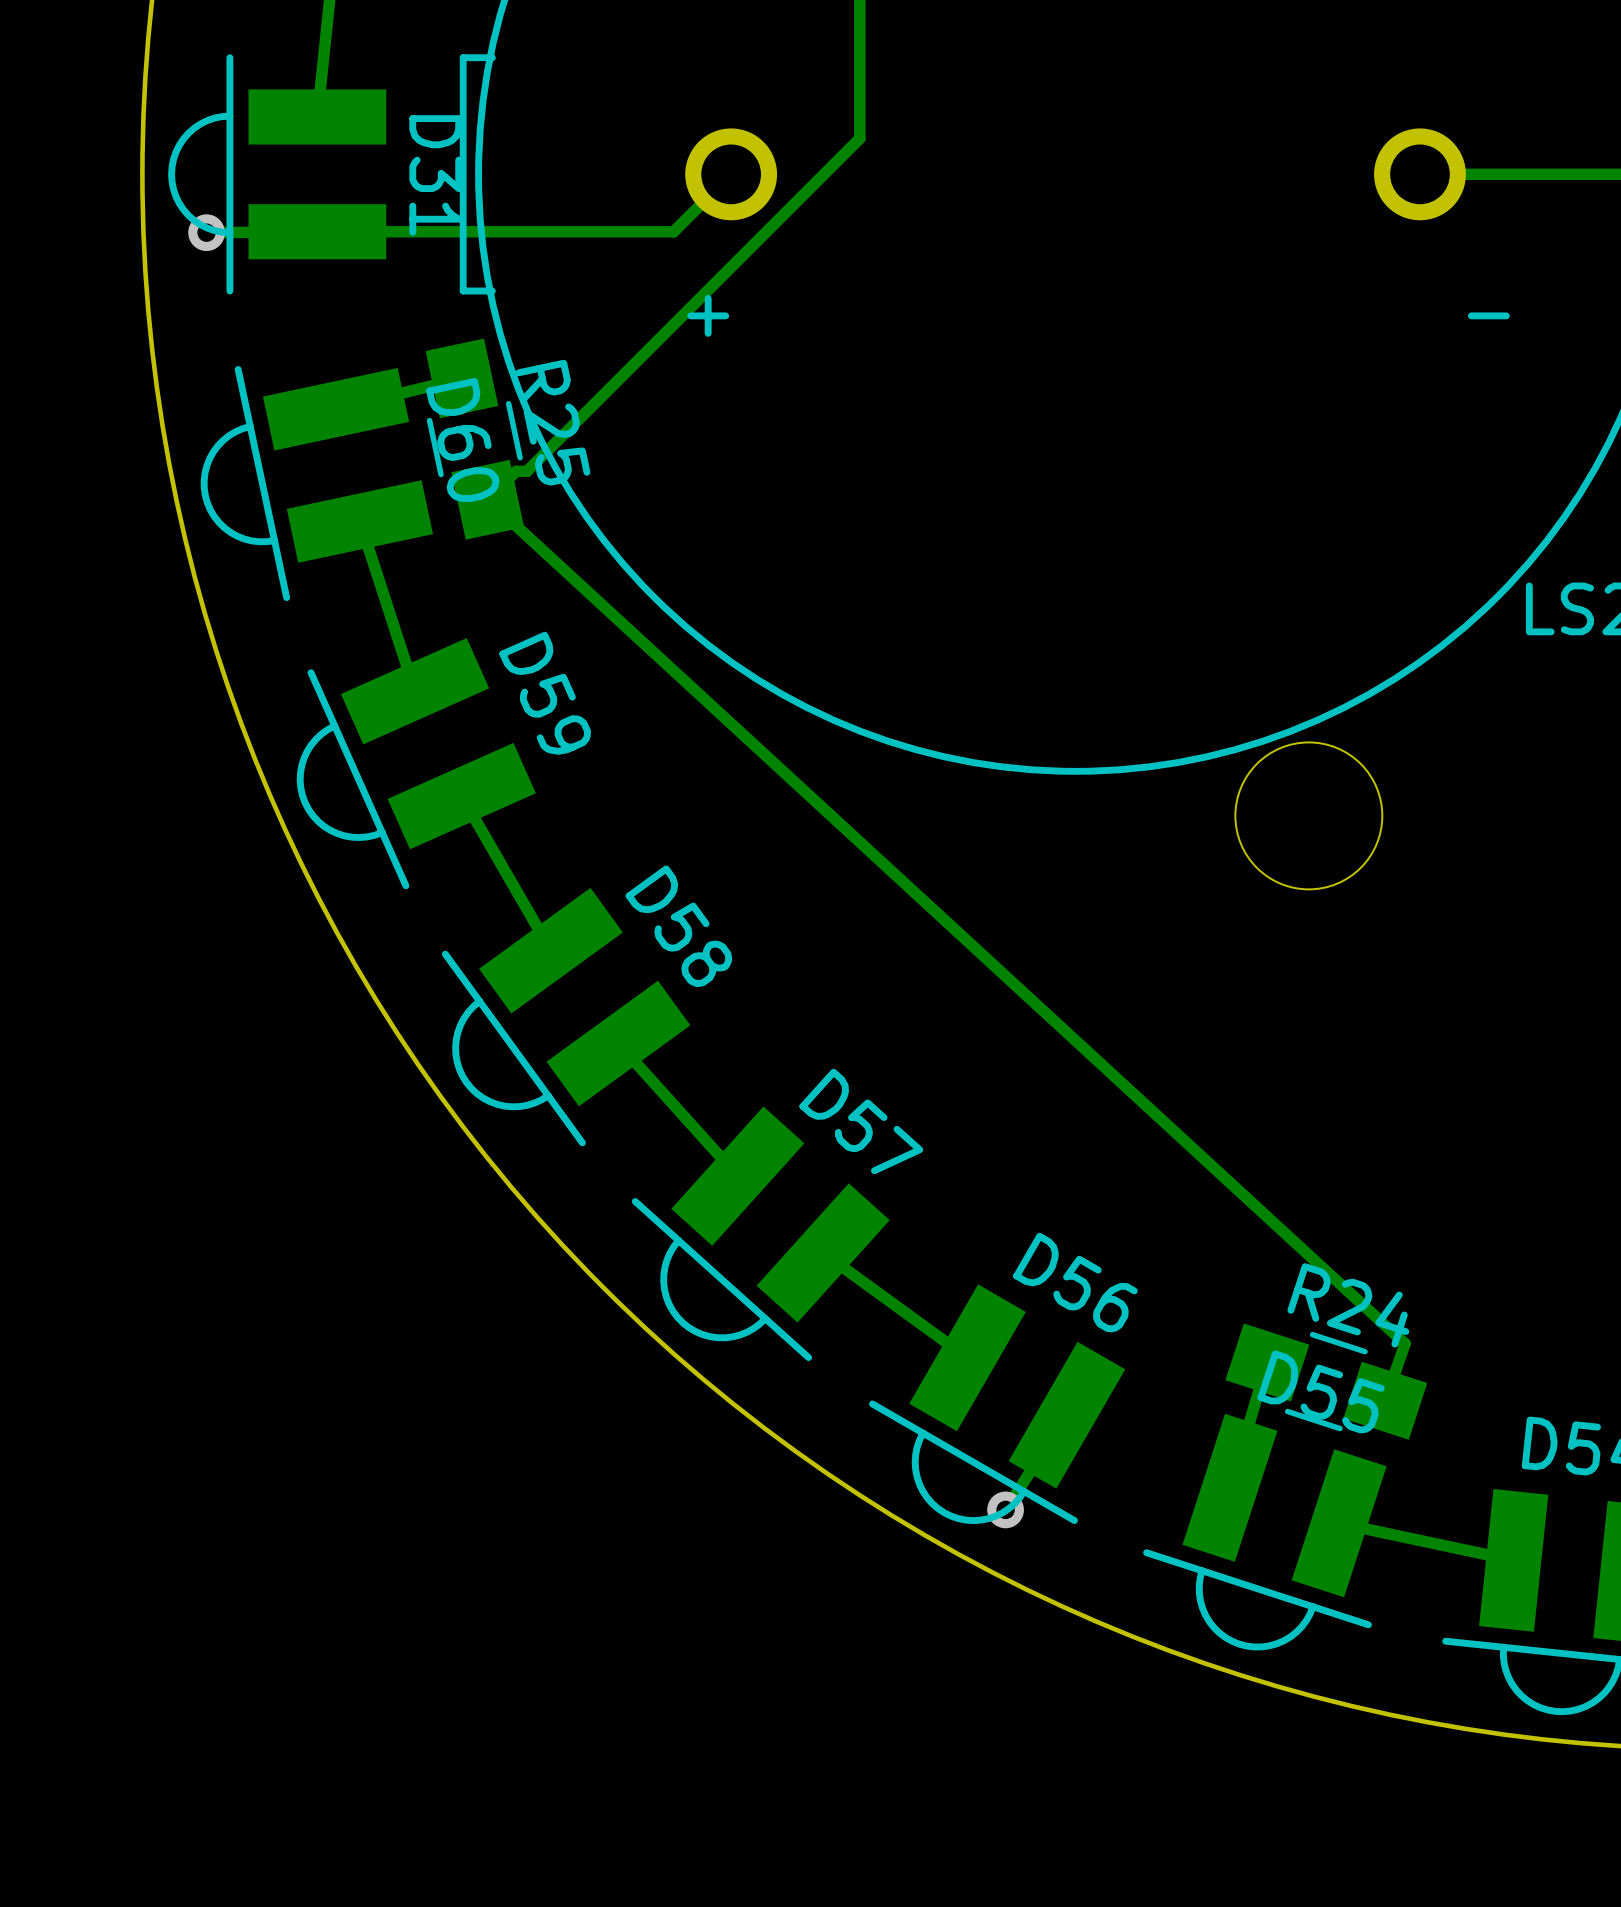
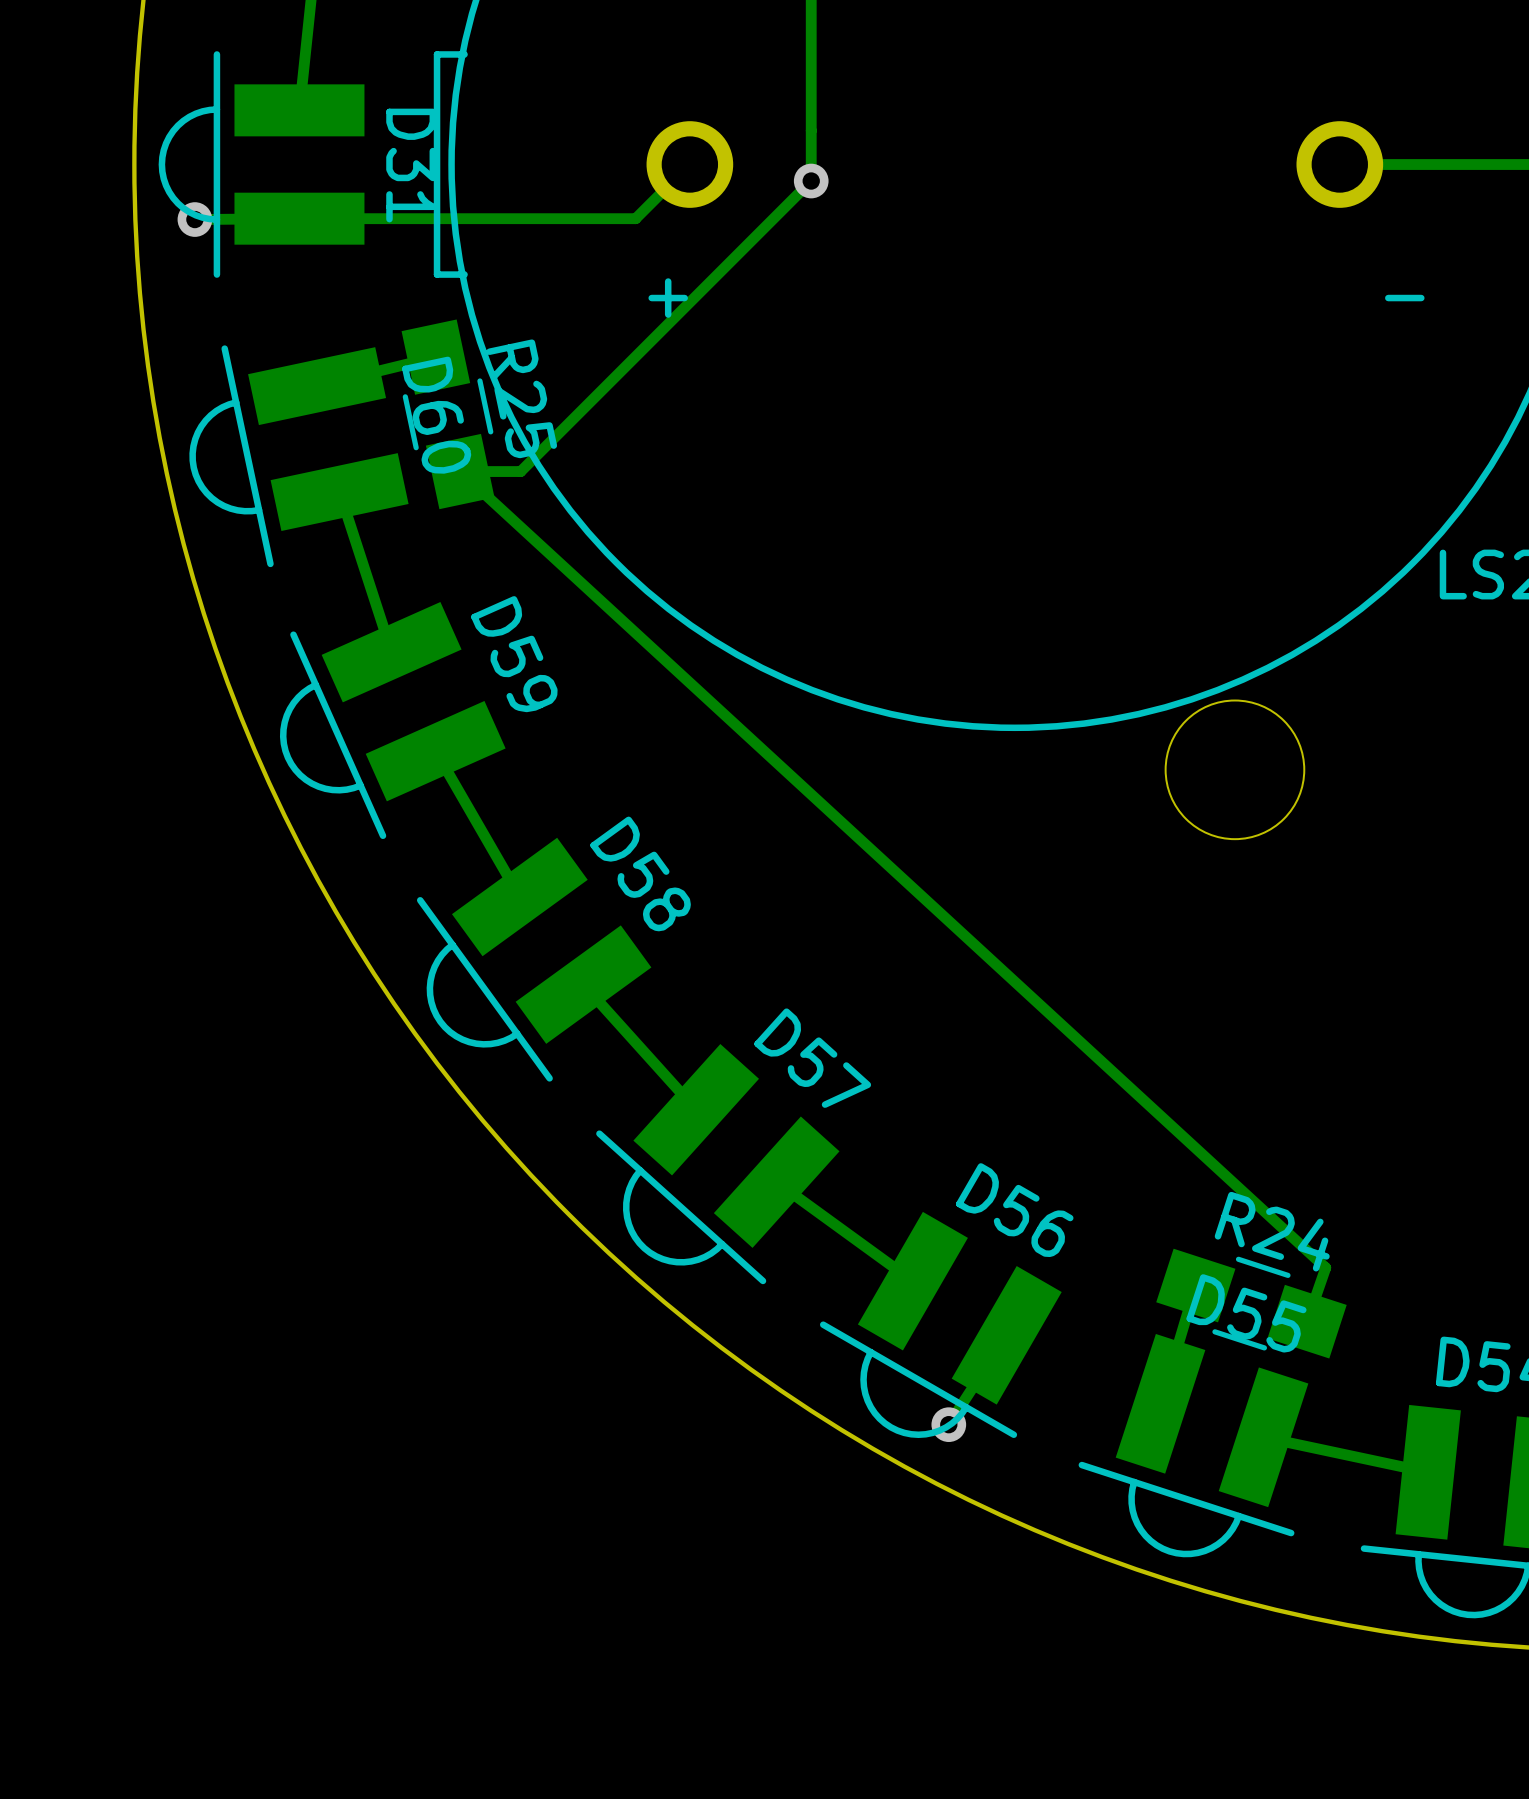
track: (859, 138) (526, 471) (516, 471) (487, 499) -> (811, 130) (811, 181) (520, 471) (460, 471)
via: none -> (811, 181)

